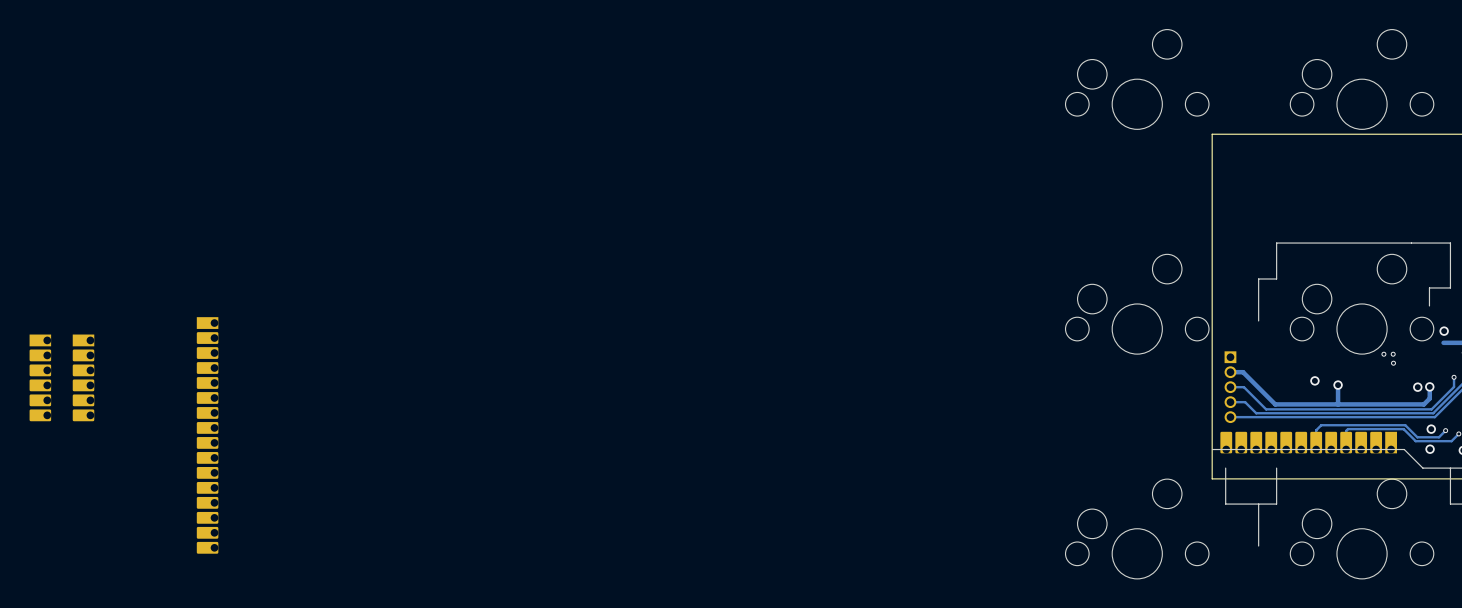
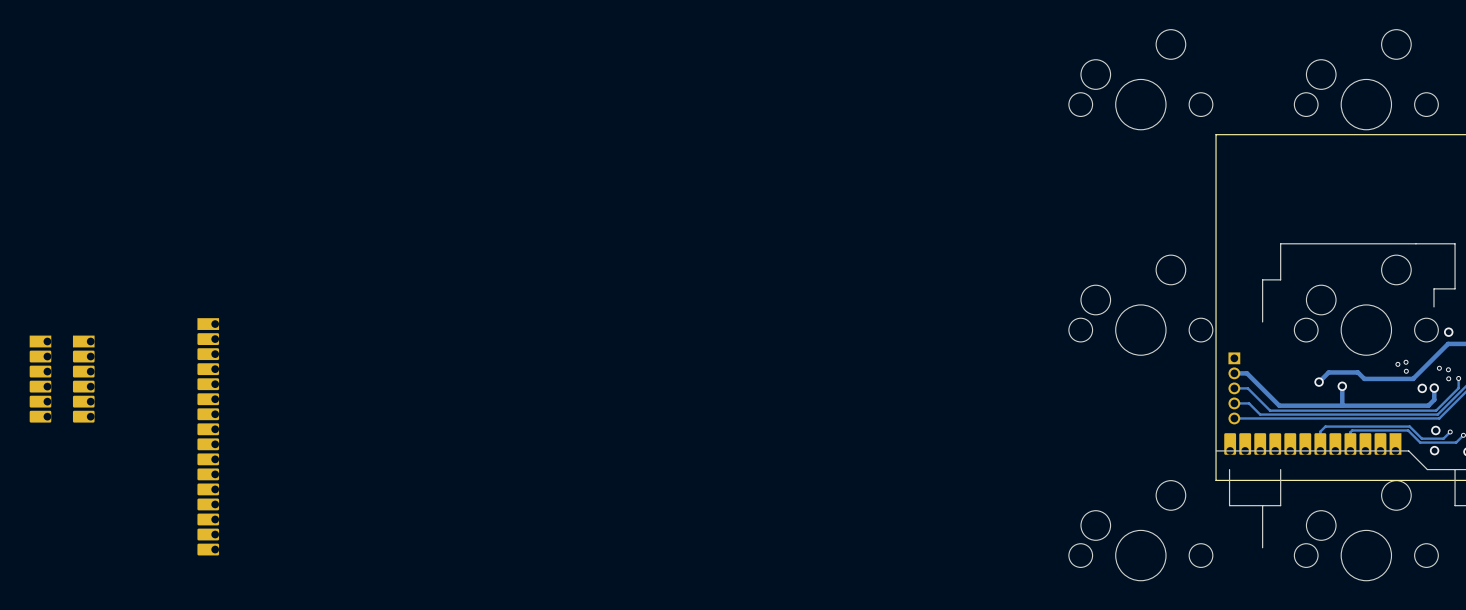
track: none -> (1448, 343) (1413, 378) (1364, 378) (1357, 372) (1328, 372) (1319, 382)
via: (1383, 354) -> none
via: (1393, 354) -> none
via: none -> (1406, 362)
via: none -> (1439, 368)
via: none -> (1448, 369)
via: none -> (1406, 371)
via: none -> (1448, 378)

